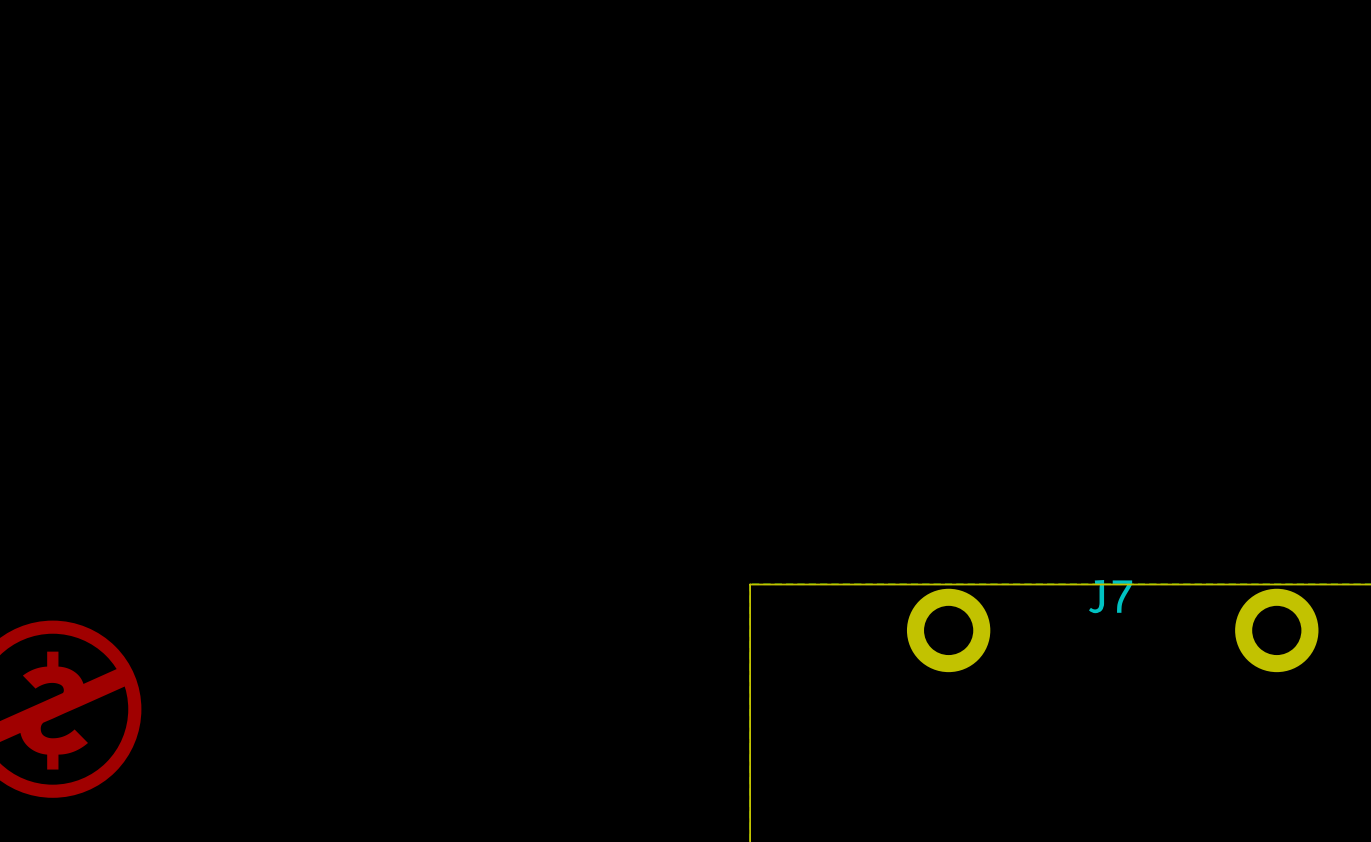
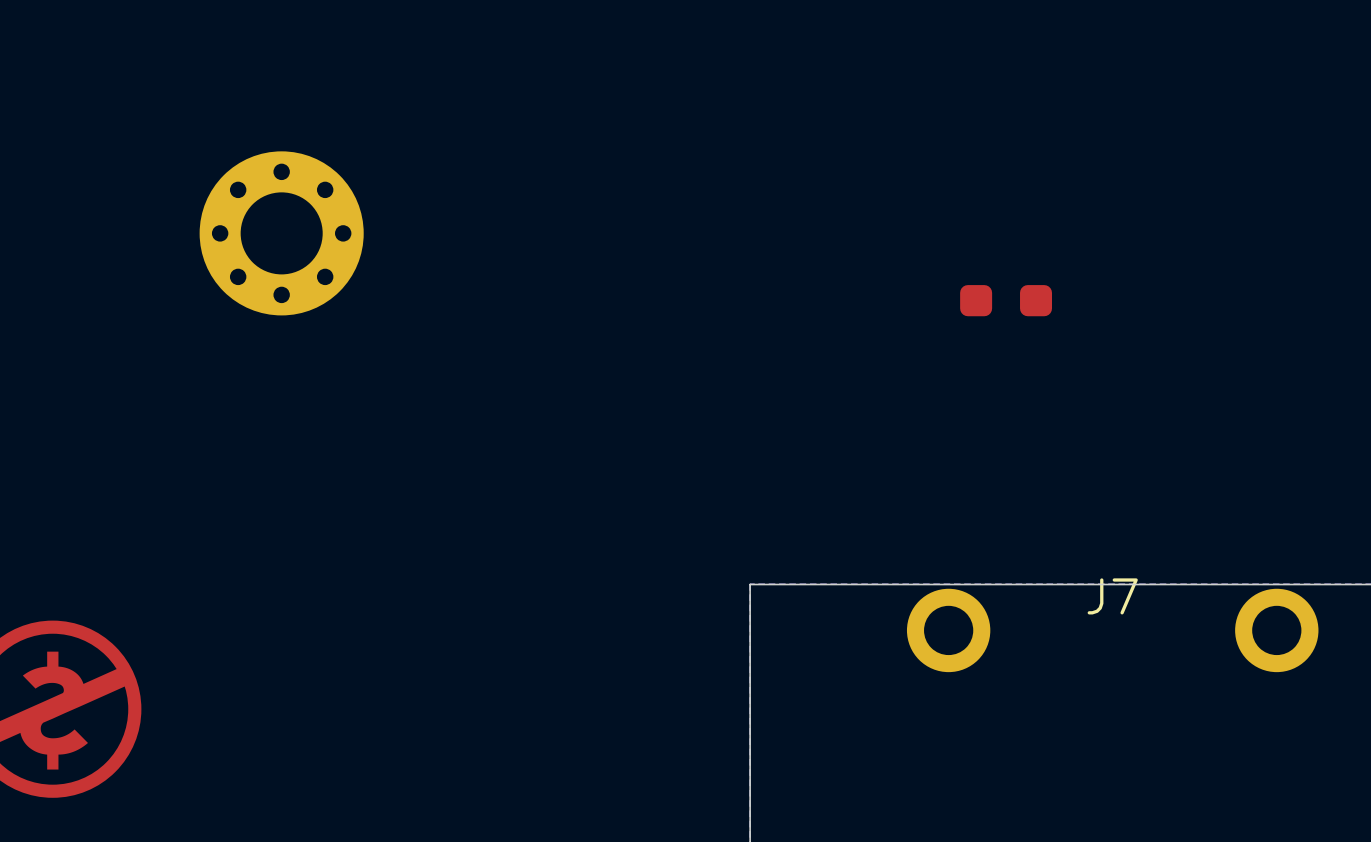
part: none -> (281, 233)
part: none -> (1006, 300)

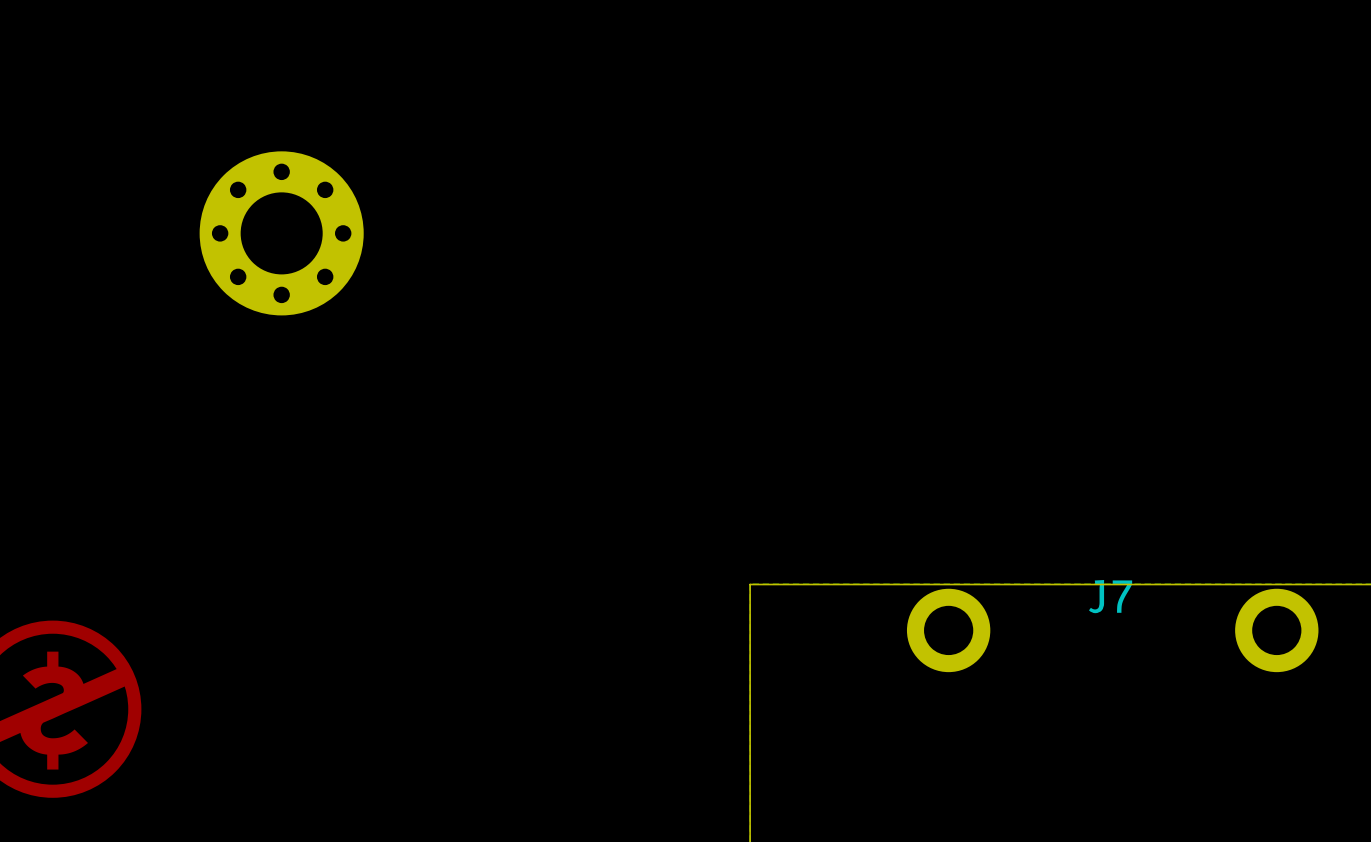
part: (1006, 300) -> none

